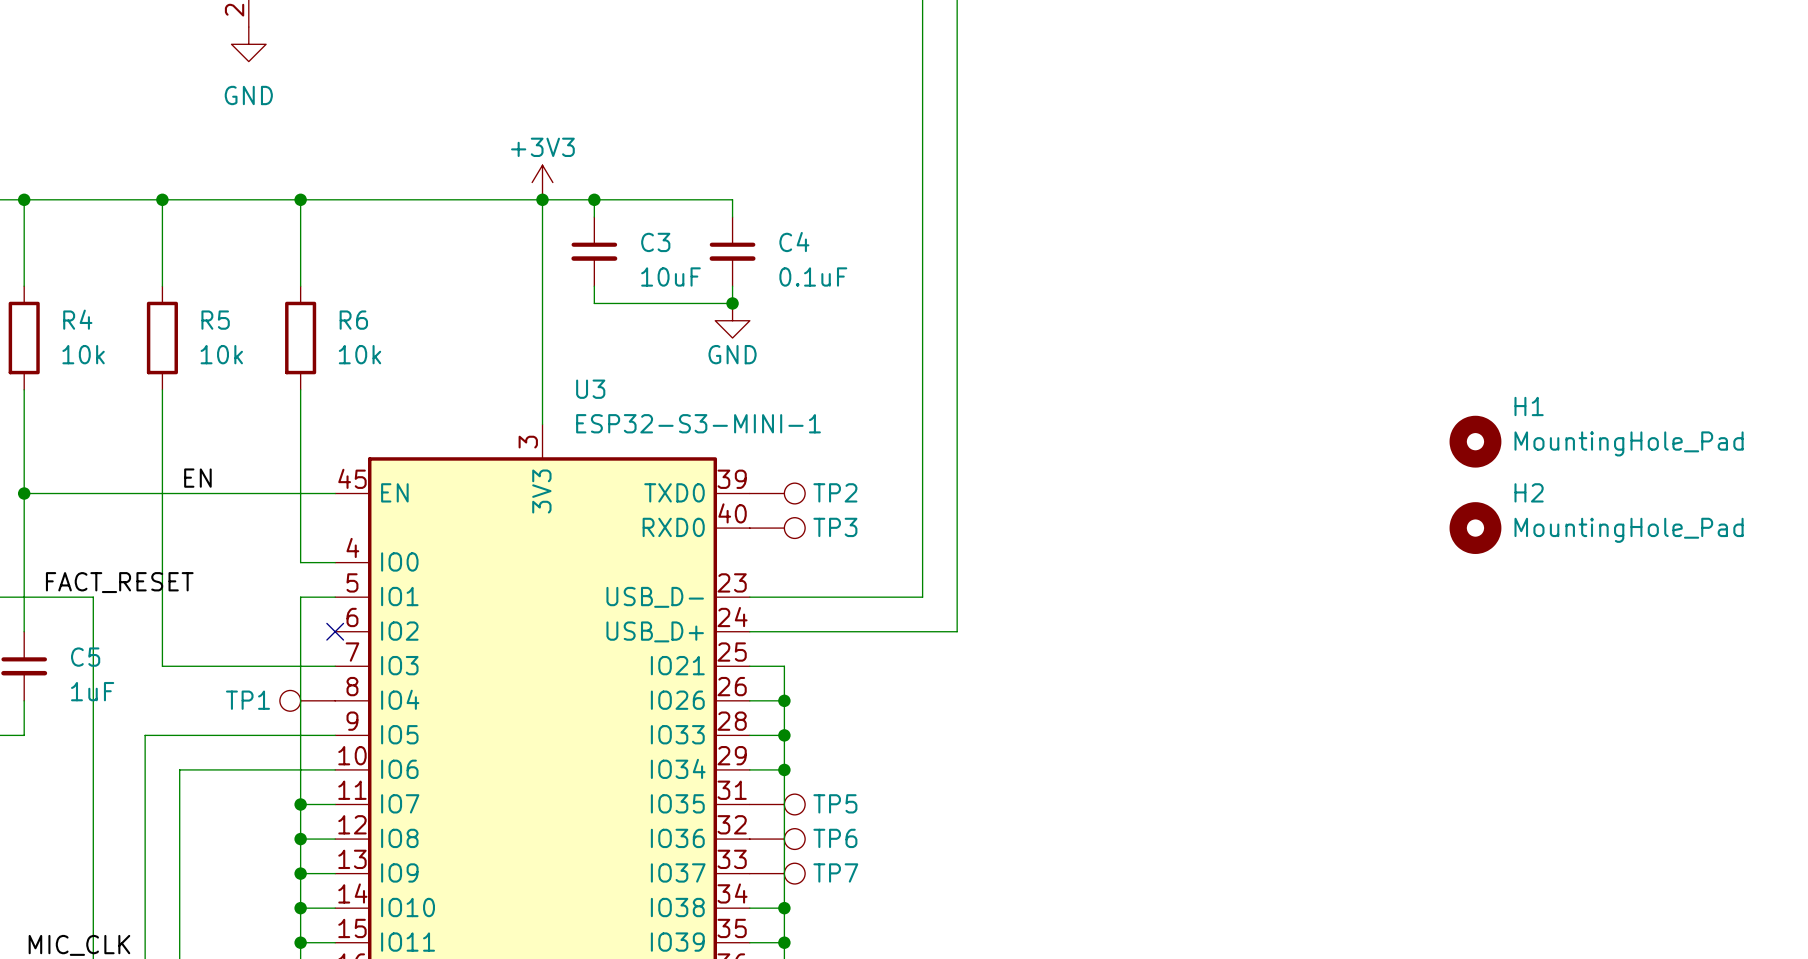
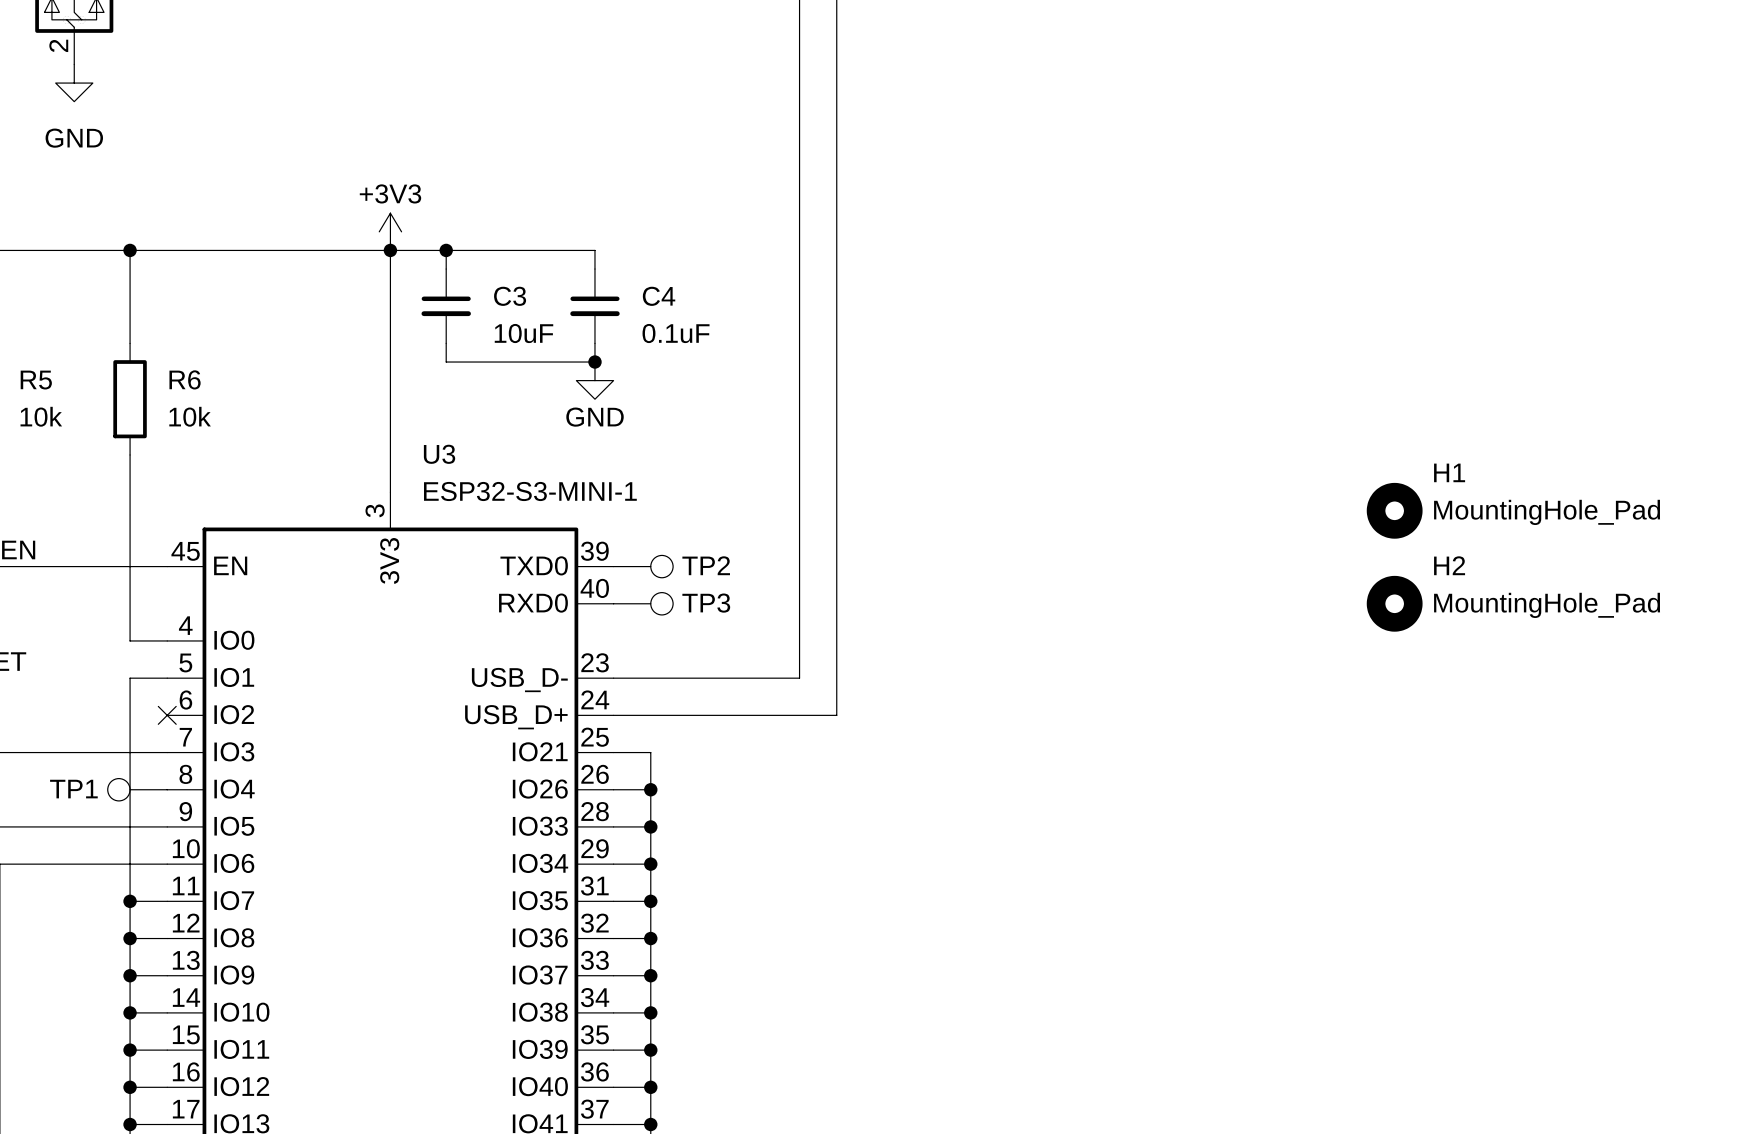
TP5: (777, 804) -> none
junction: none -> (650, 901)
TP6: (777, 839) -> none
junction: none -> (650, 938)
TP7: (777, 873) -> none
junction: none -> (650, 975)

